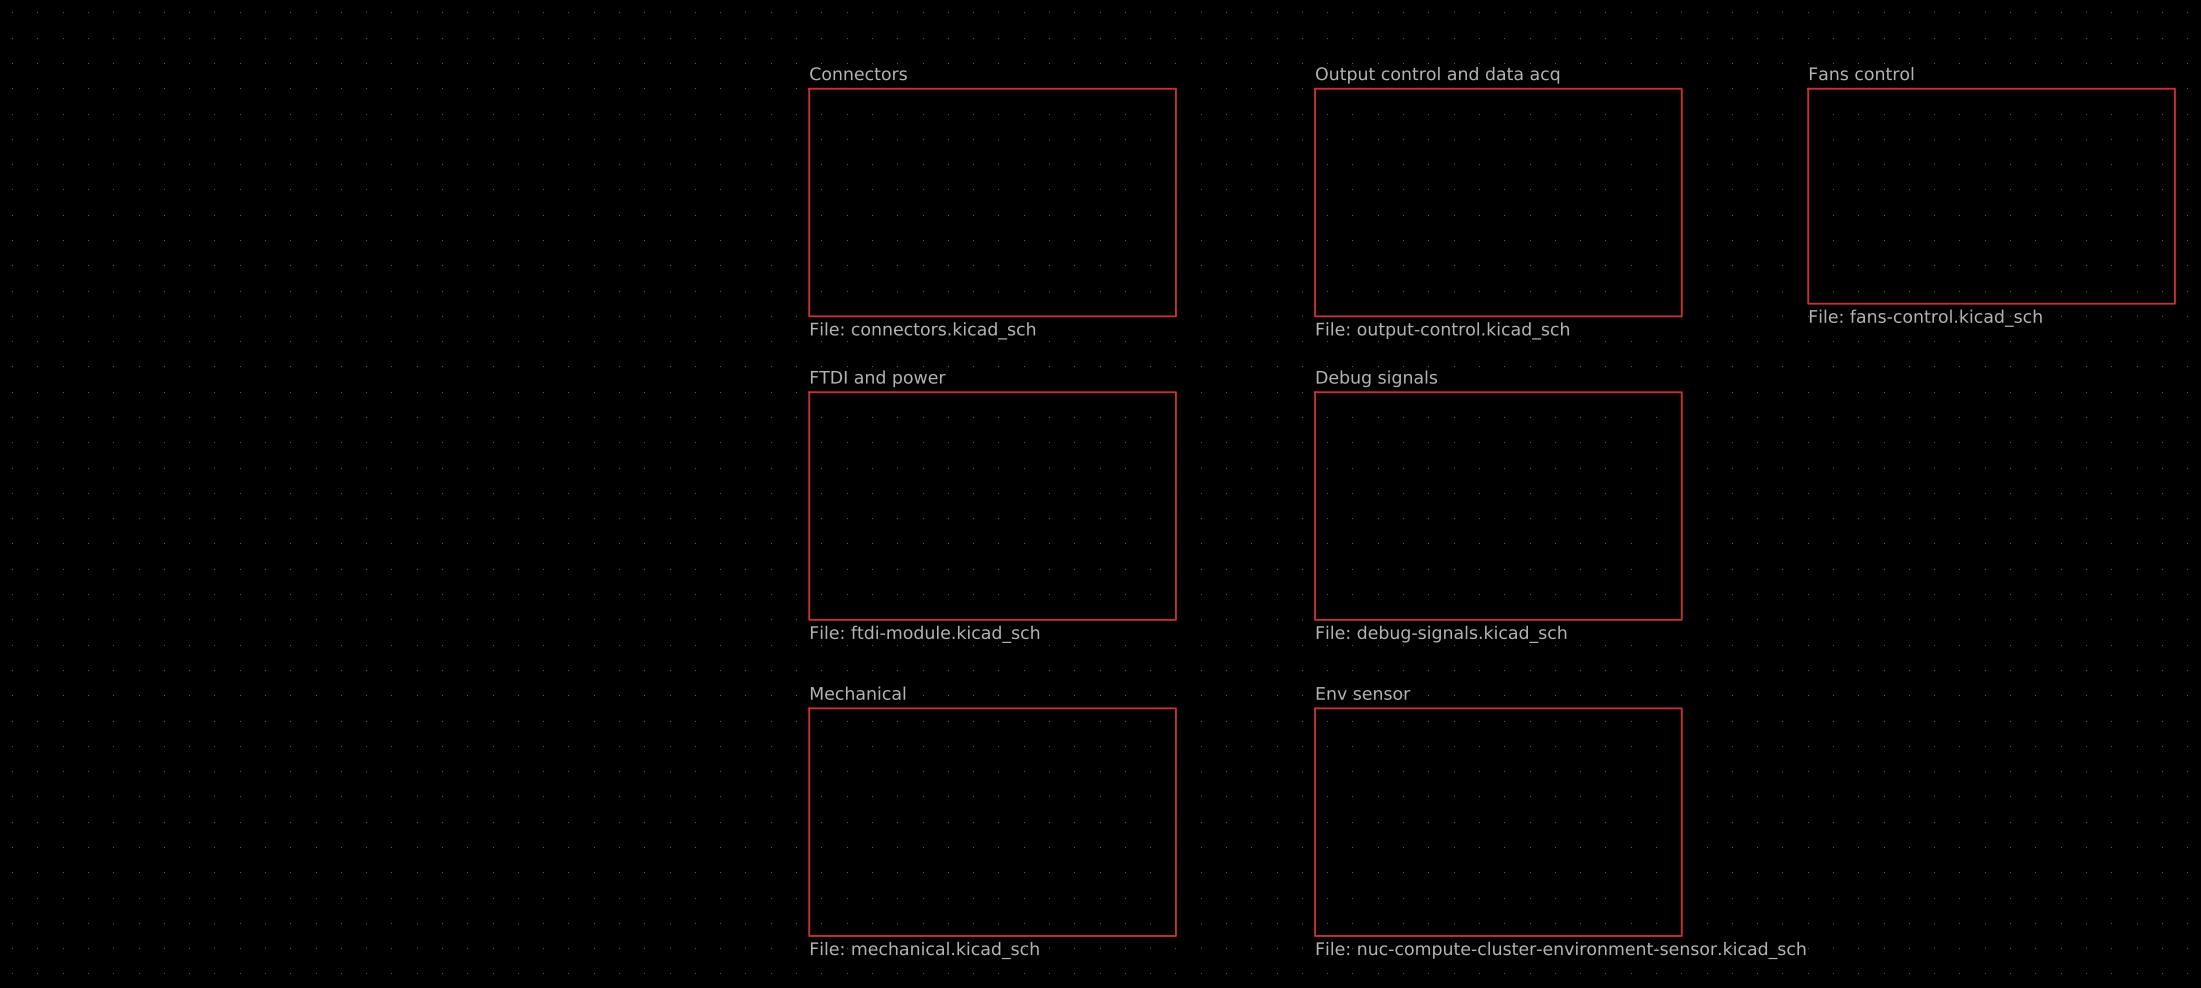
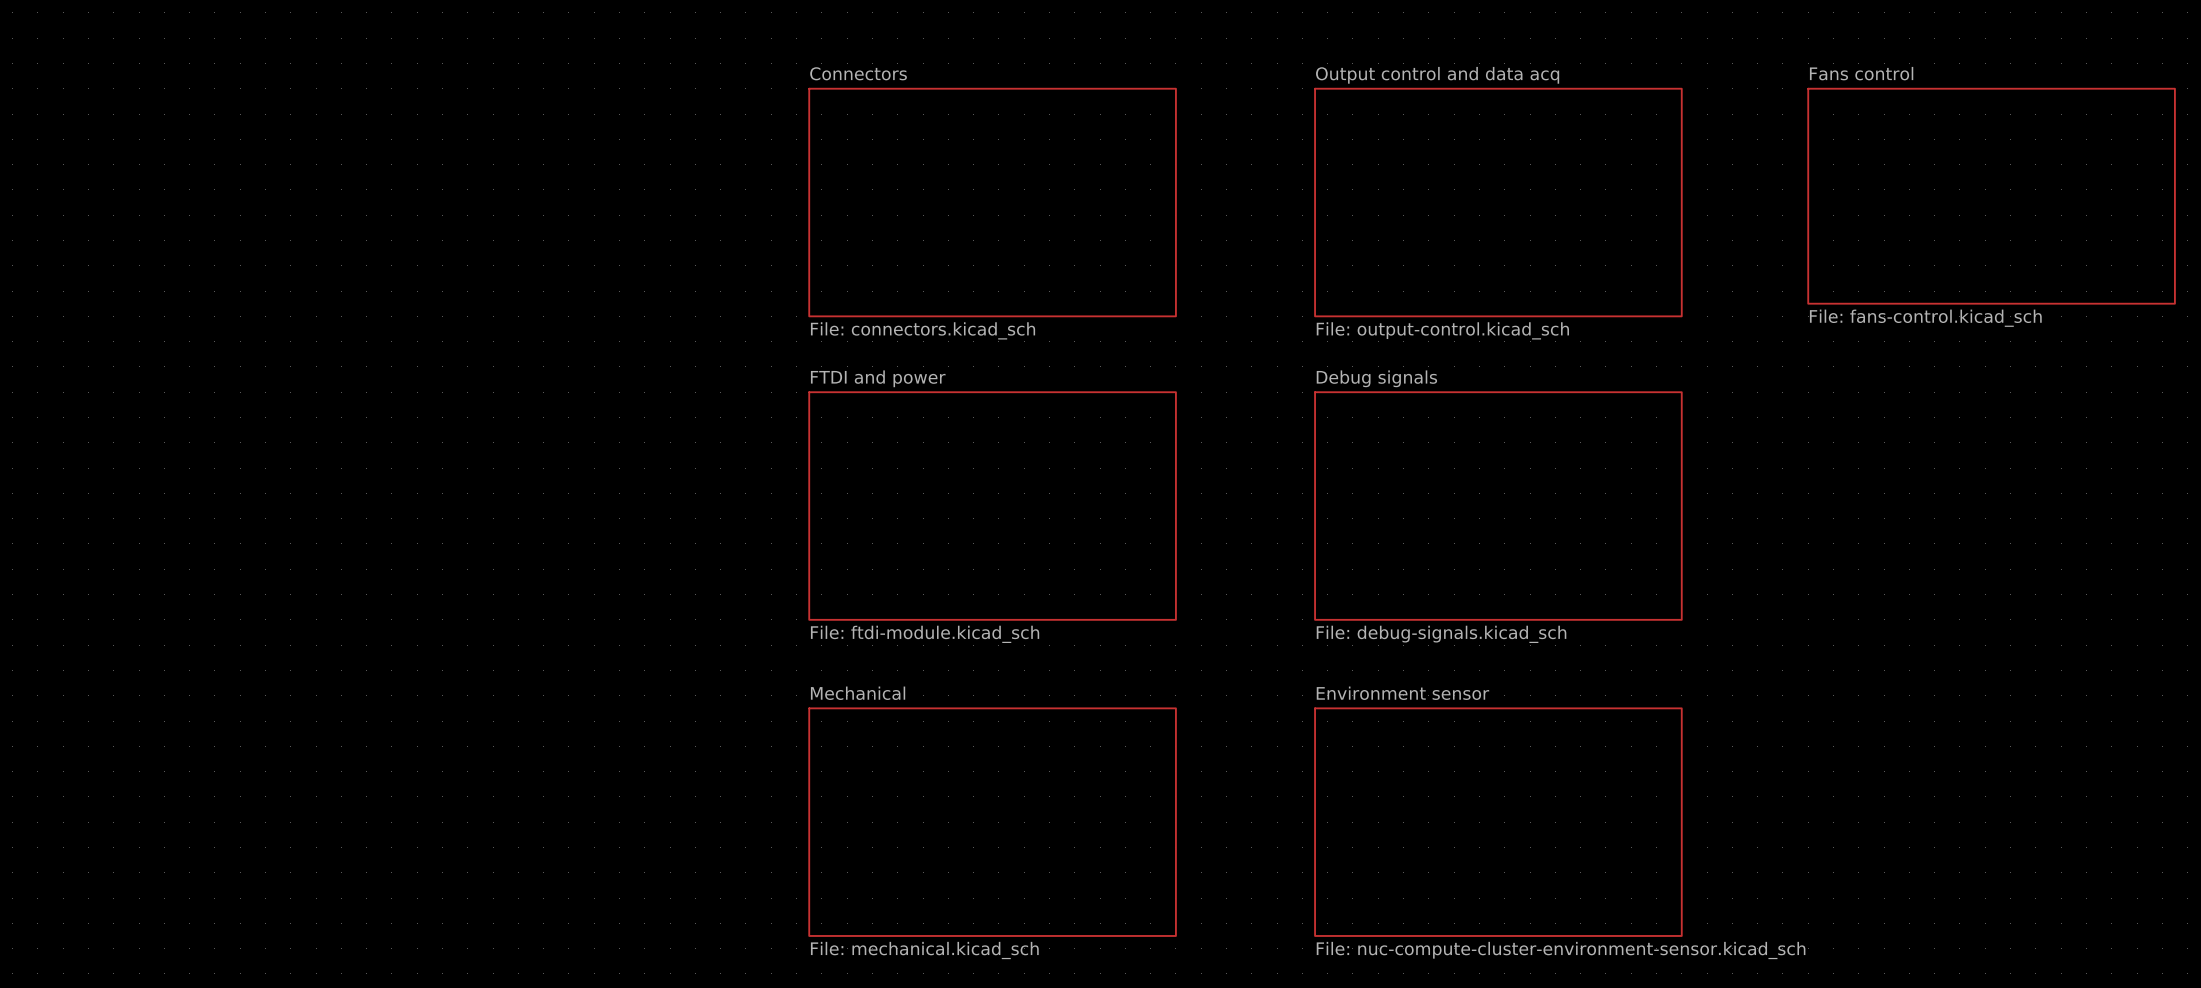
sheet Env sensor name: Env sensor (1363, 693) -> Environment sensor (1402, 693)

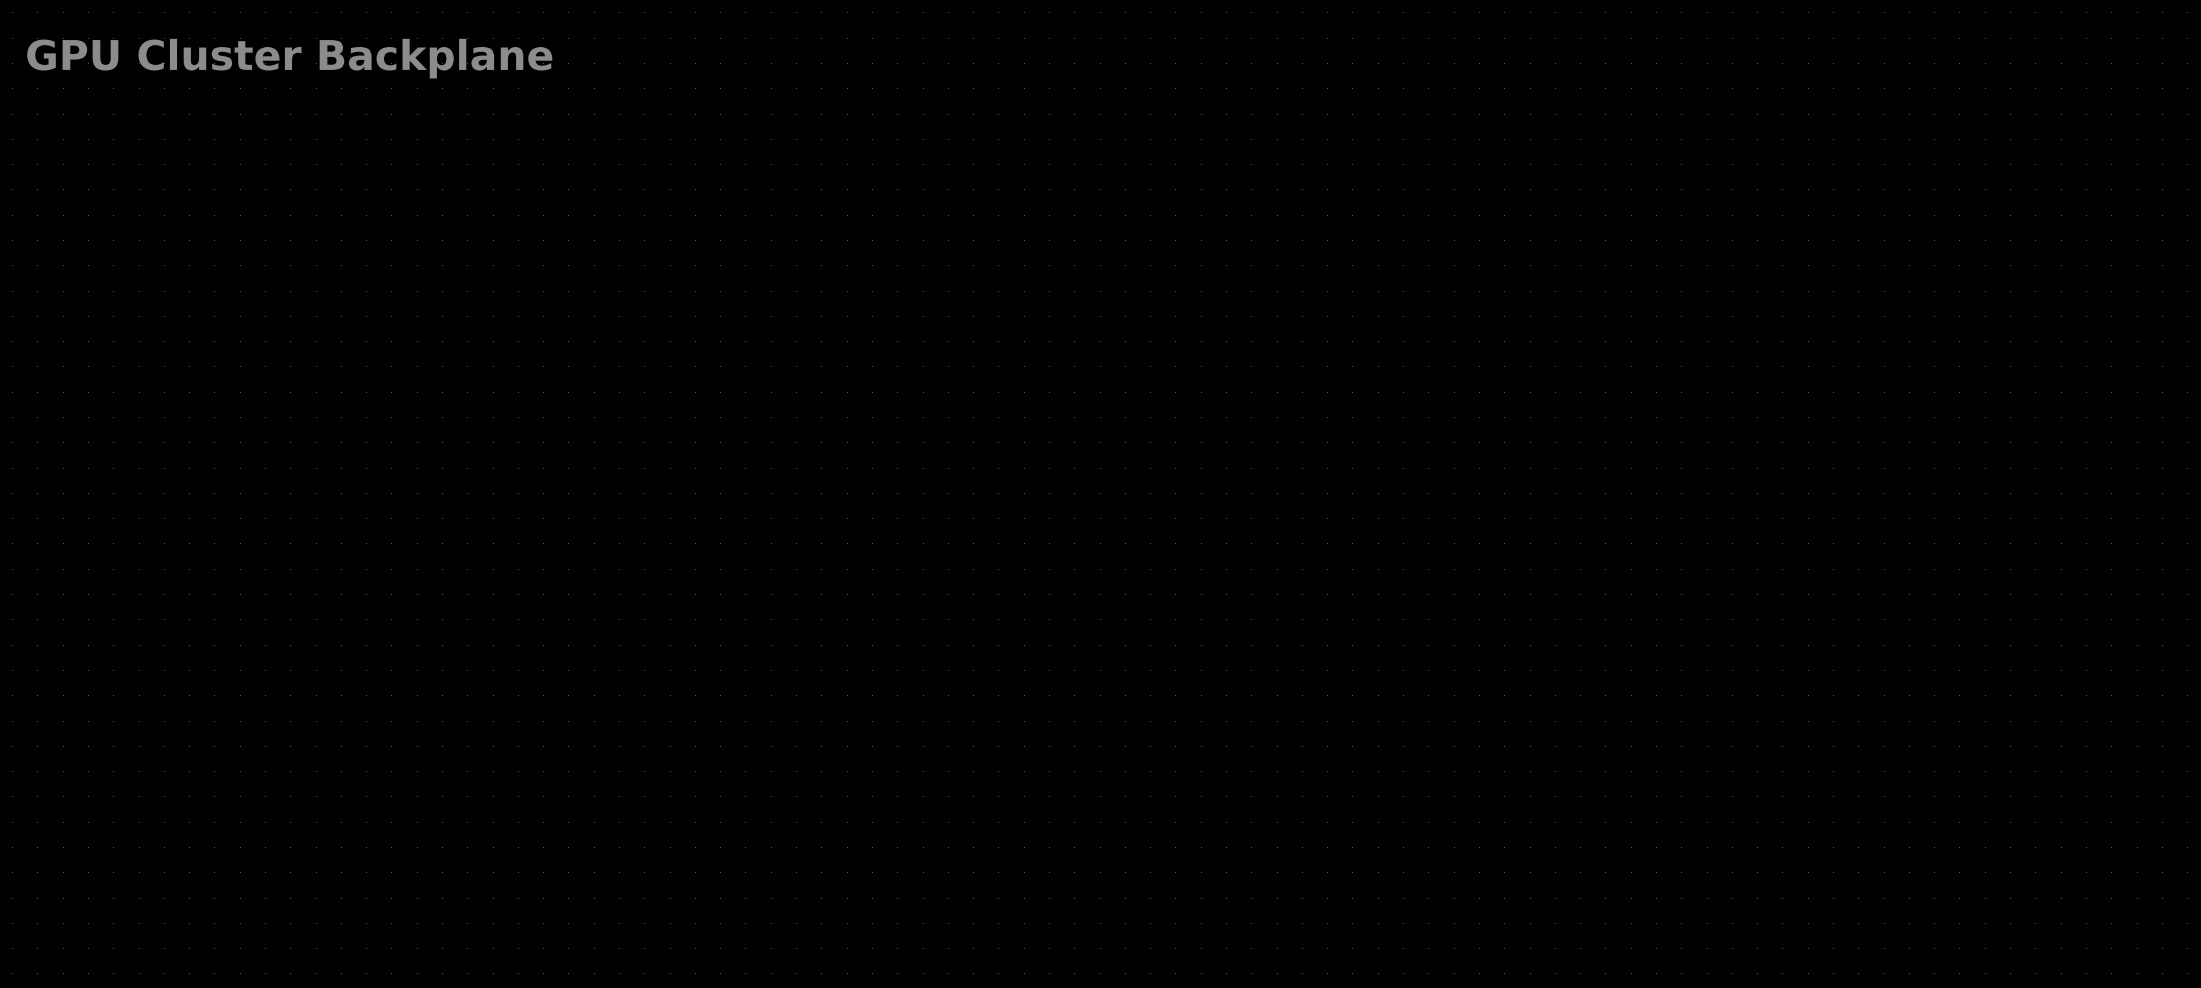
text: none -> GPU Cluster Backplane (289, 58)
sheet Fans control: File: fans-control.kicad_sch (1991, 196) -> none
sheet Connectors: File: connectors.kicad_sch (992, 202) -> none
sheet Output control and data acq: File: output-control.kicad_sch (1498, 202) -> none
sheet FTDI and power: File: ftdi-module.kicad_sch (992, 506) -> none
sheet Debug signals: File: debug-signals.kicad_sch (1498, 506) -> none
sheet Mechanical: File: mechanical.kicad_sch (992, 822) -> none
sheet Environment sensor: File: nuc-compute-cluster-environment-sensor.kicad_sch (1498, 822) -> none

